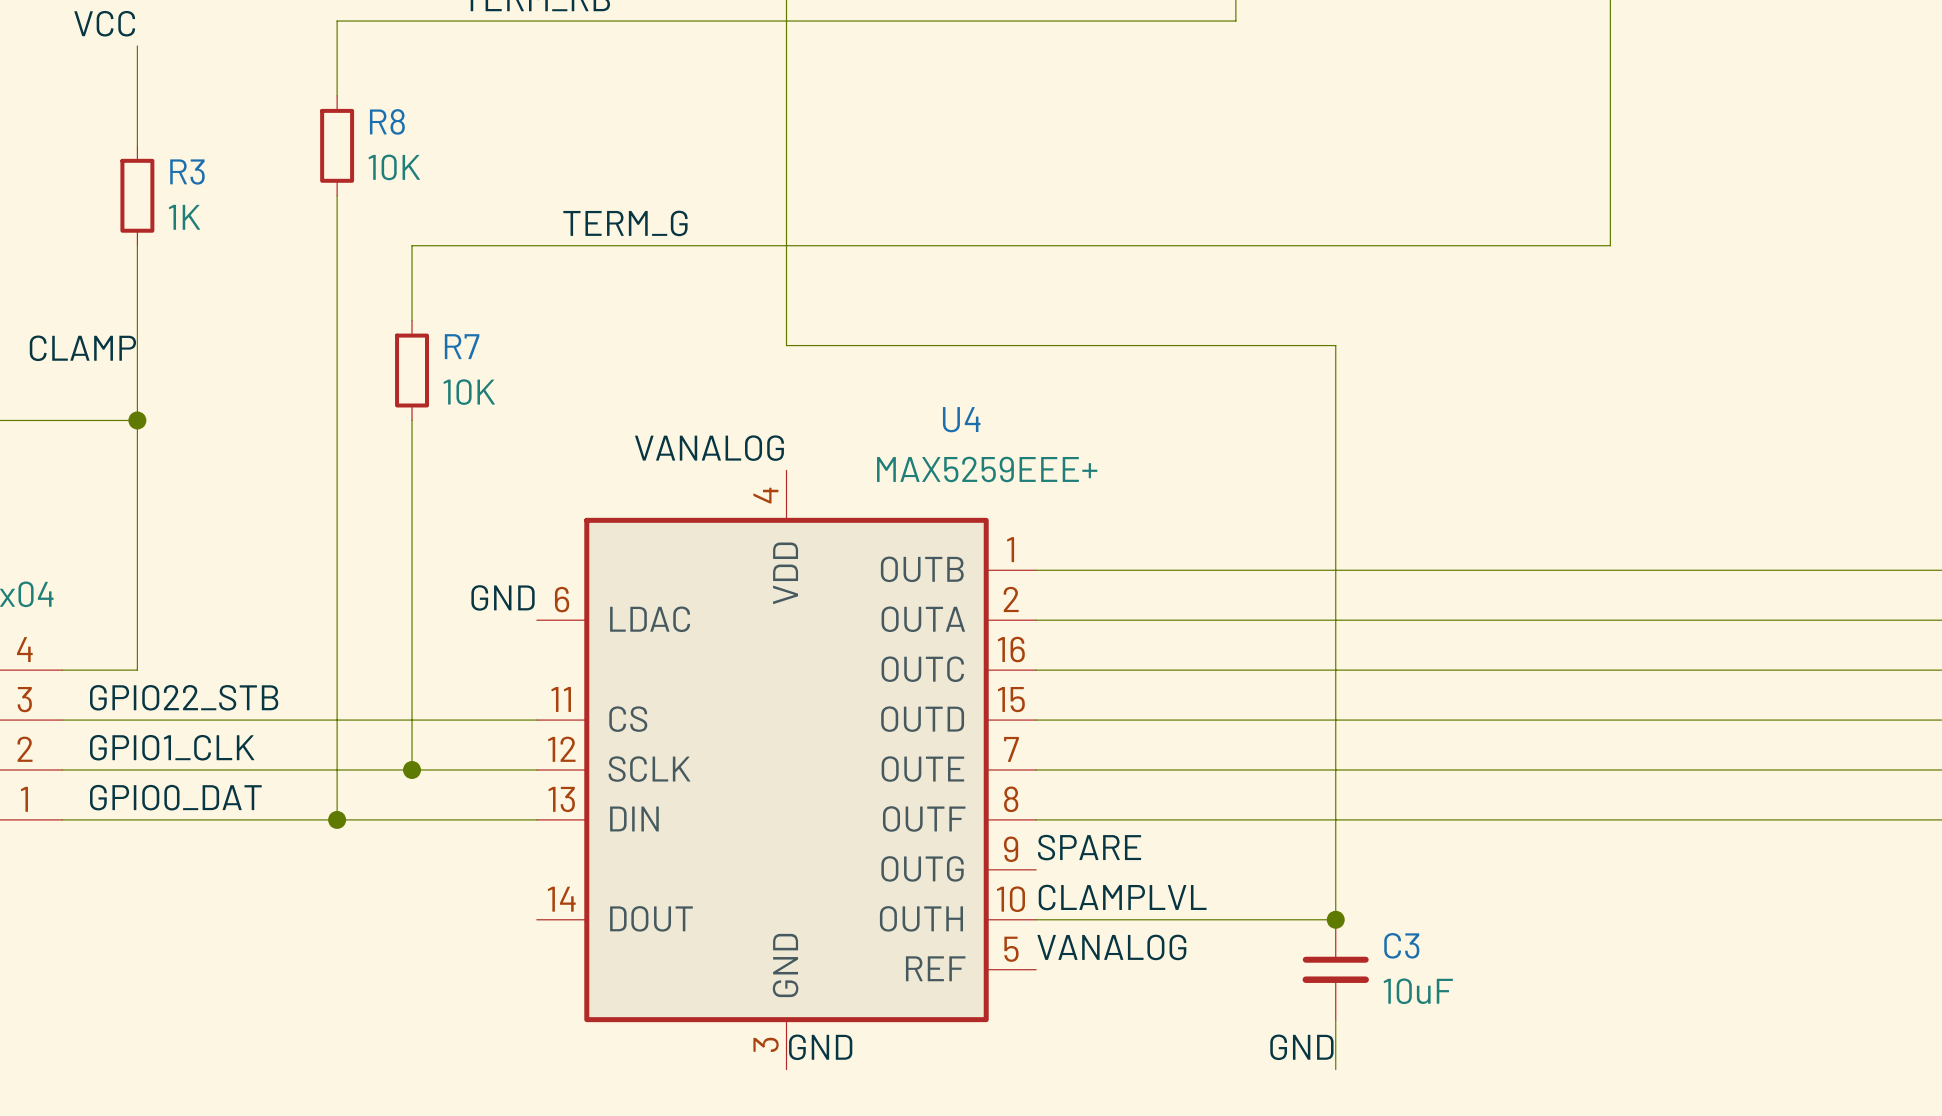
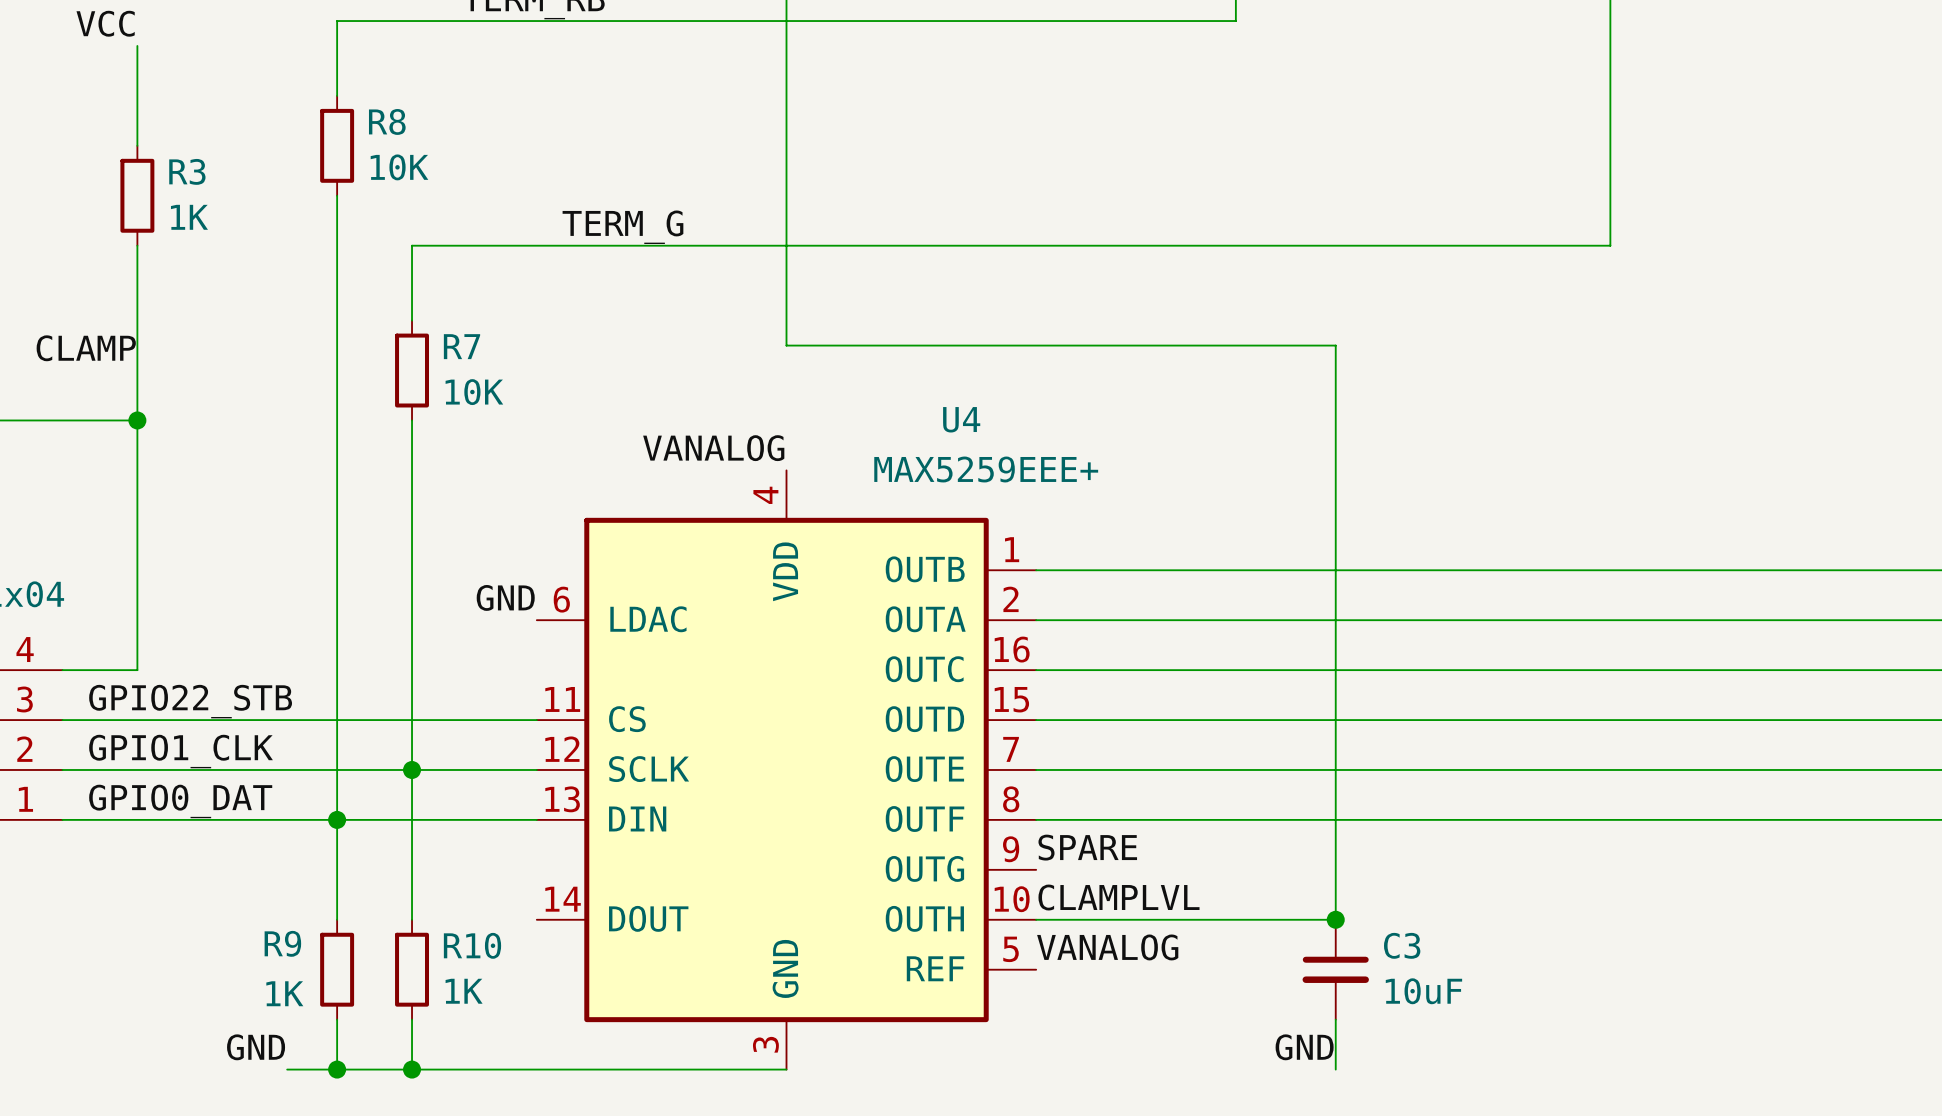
wire: none -> (412, 769) (412, 919)
wire: none -> (337, 819) (337, 919)
R9: none -> 1K (337, 969)
R10: none -> 1K (412, 969)
wire: none -> (337, 1019) (337, 1069)
wire: none -> (412, 1019) (412, 1069)
label: none -> GND (256, 1047)
label: GND (820, 1047) -> none
wire: none -> (287, 1069) (786, 1069)
junction: none -> (337, 1069)
junction: none -> (412, 1069)

